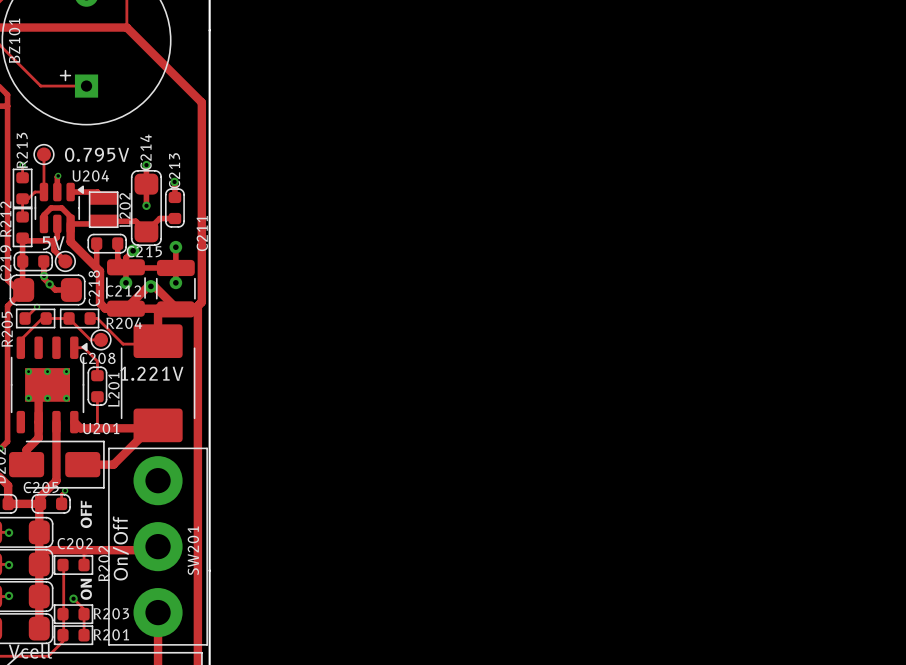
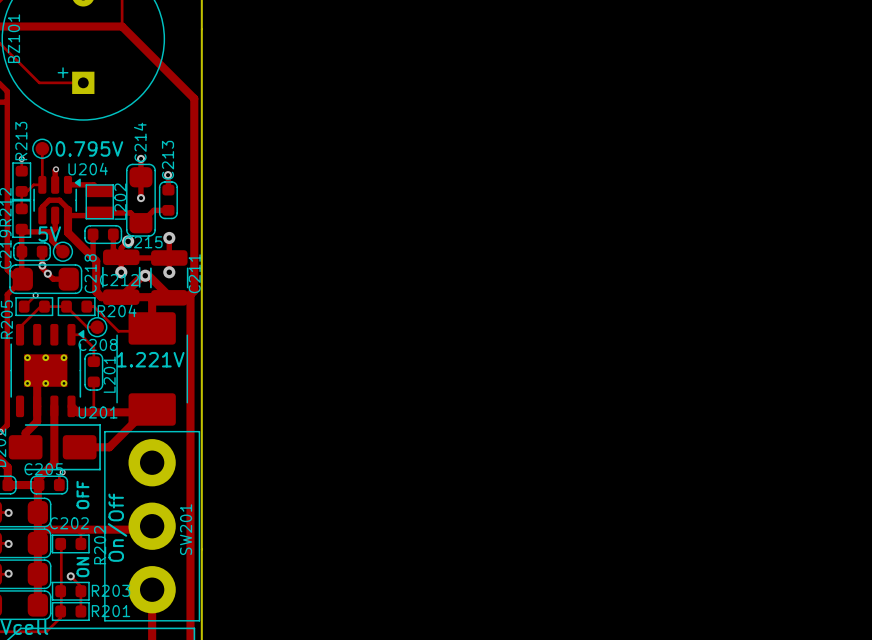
C211 name position: C211 (202, 233) -> C211 (194, 273)

